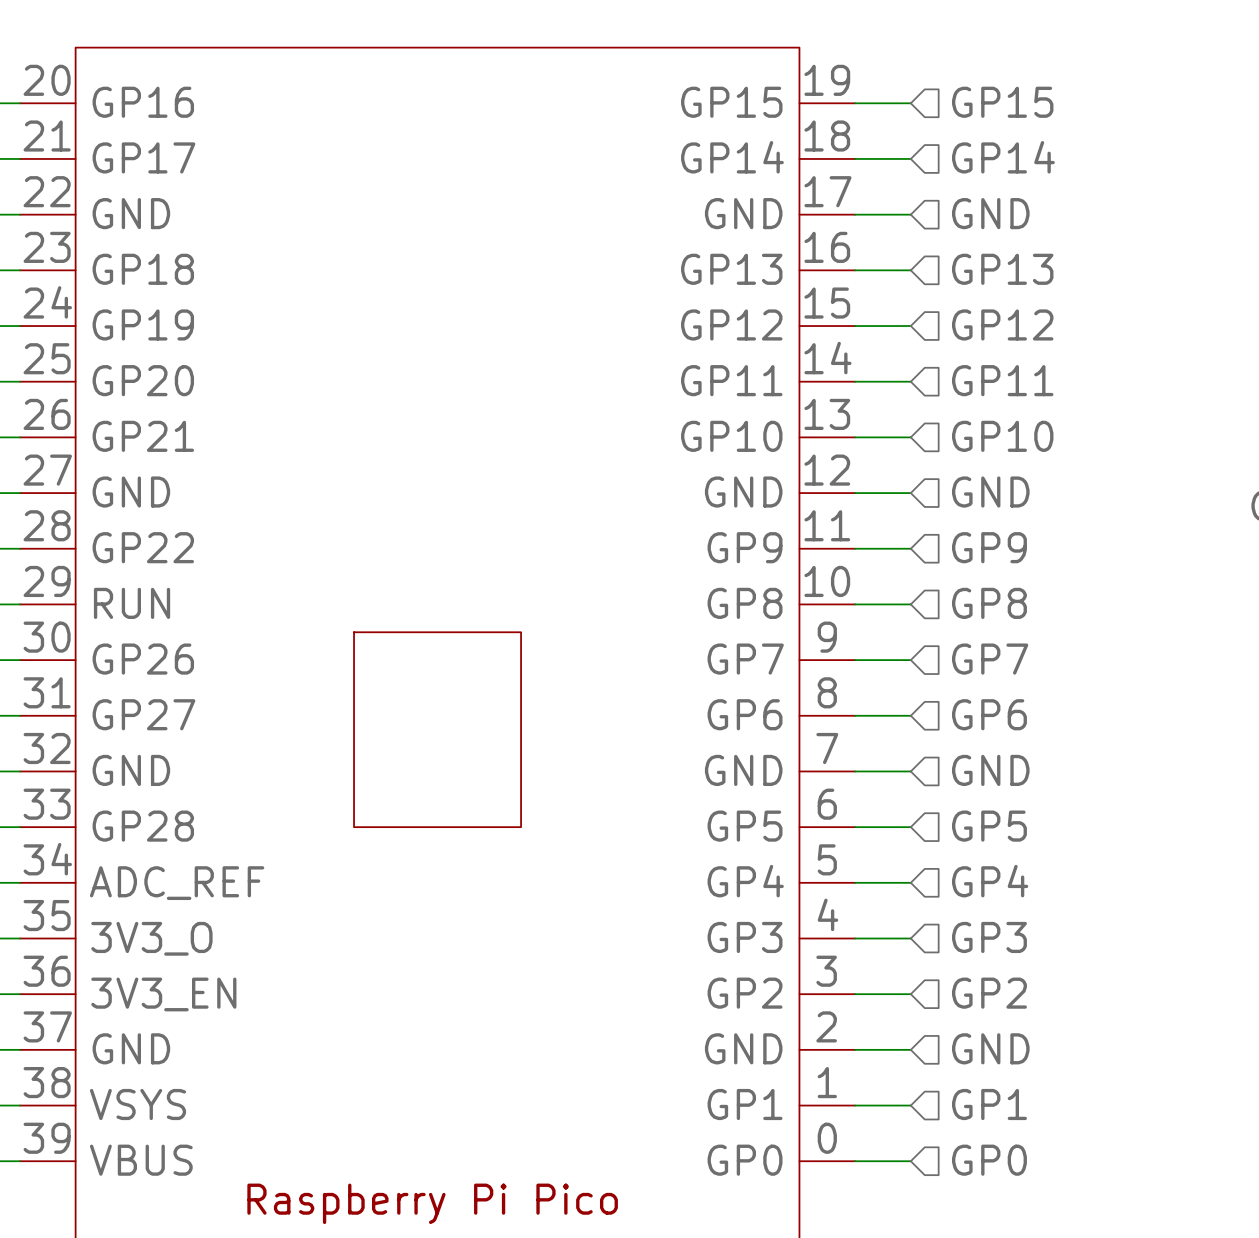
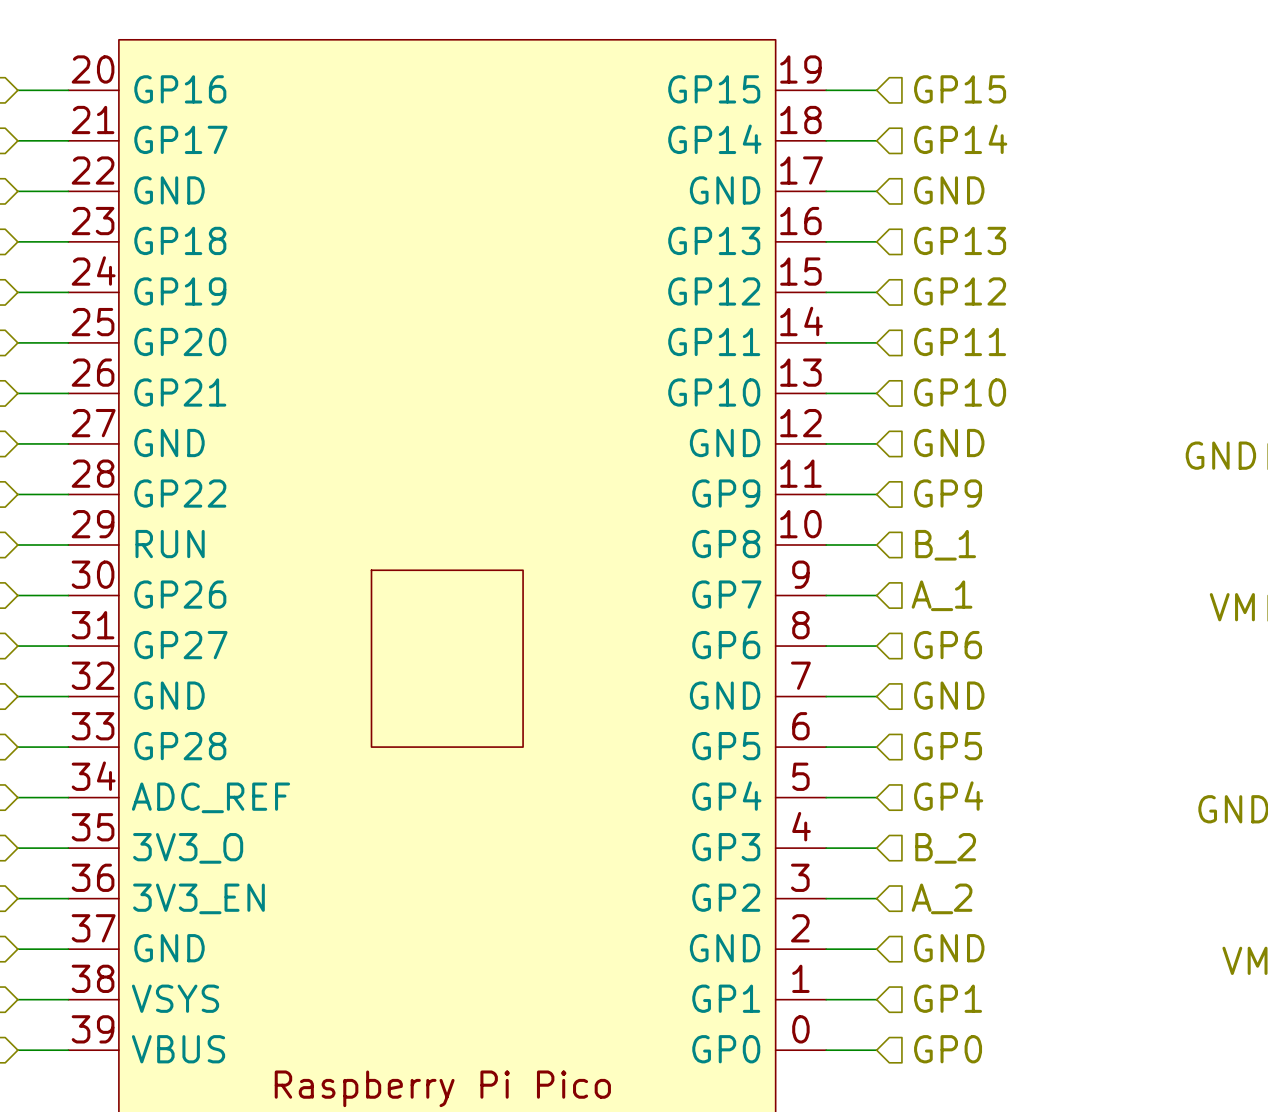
hierarchical label: GP8 (989, 603) -> B_1 (945, 545)
hierarchical label: GP7 (990, 659) -> A_1 (942, 595)
hierarchical label: GP3 (989, 937) -> B_2 (945, 848)
hierarchical label: GP2 (989, 993) -> A_2 (942, 898)

